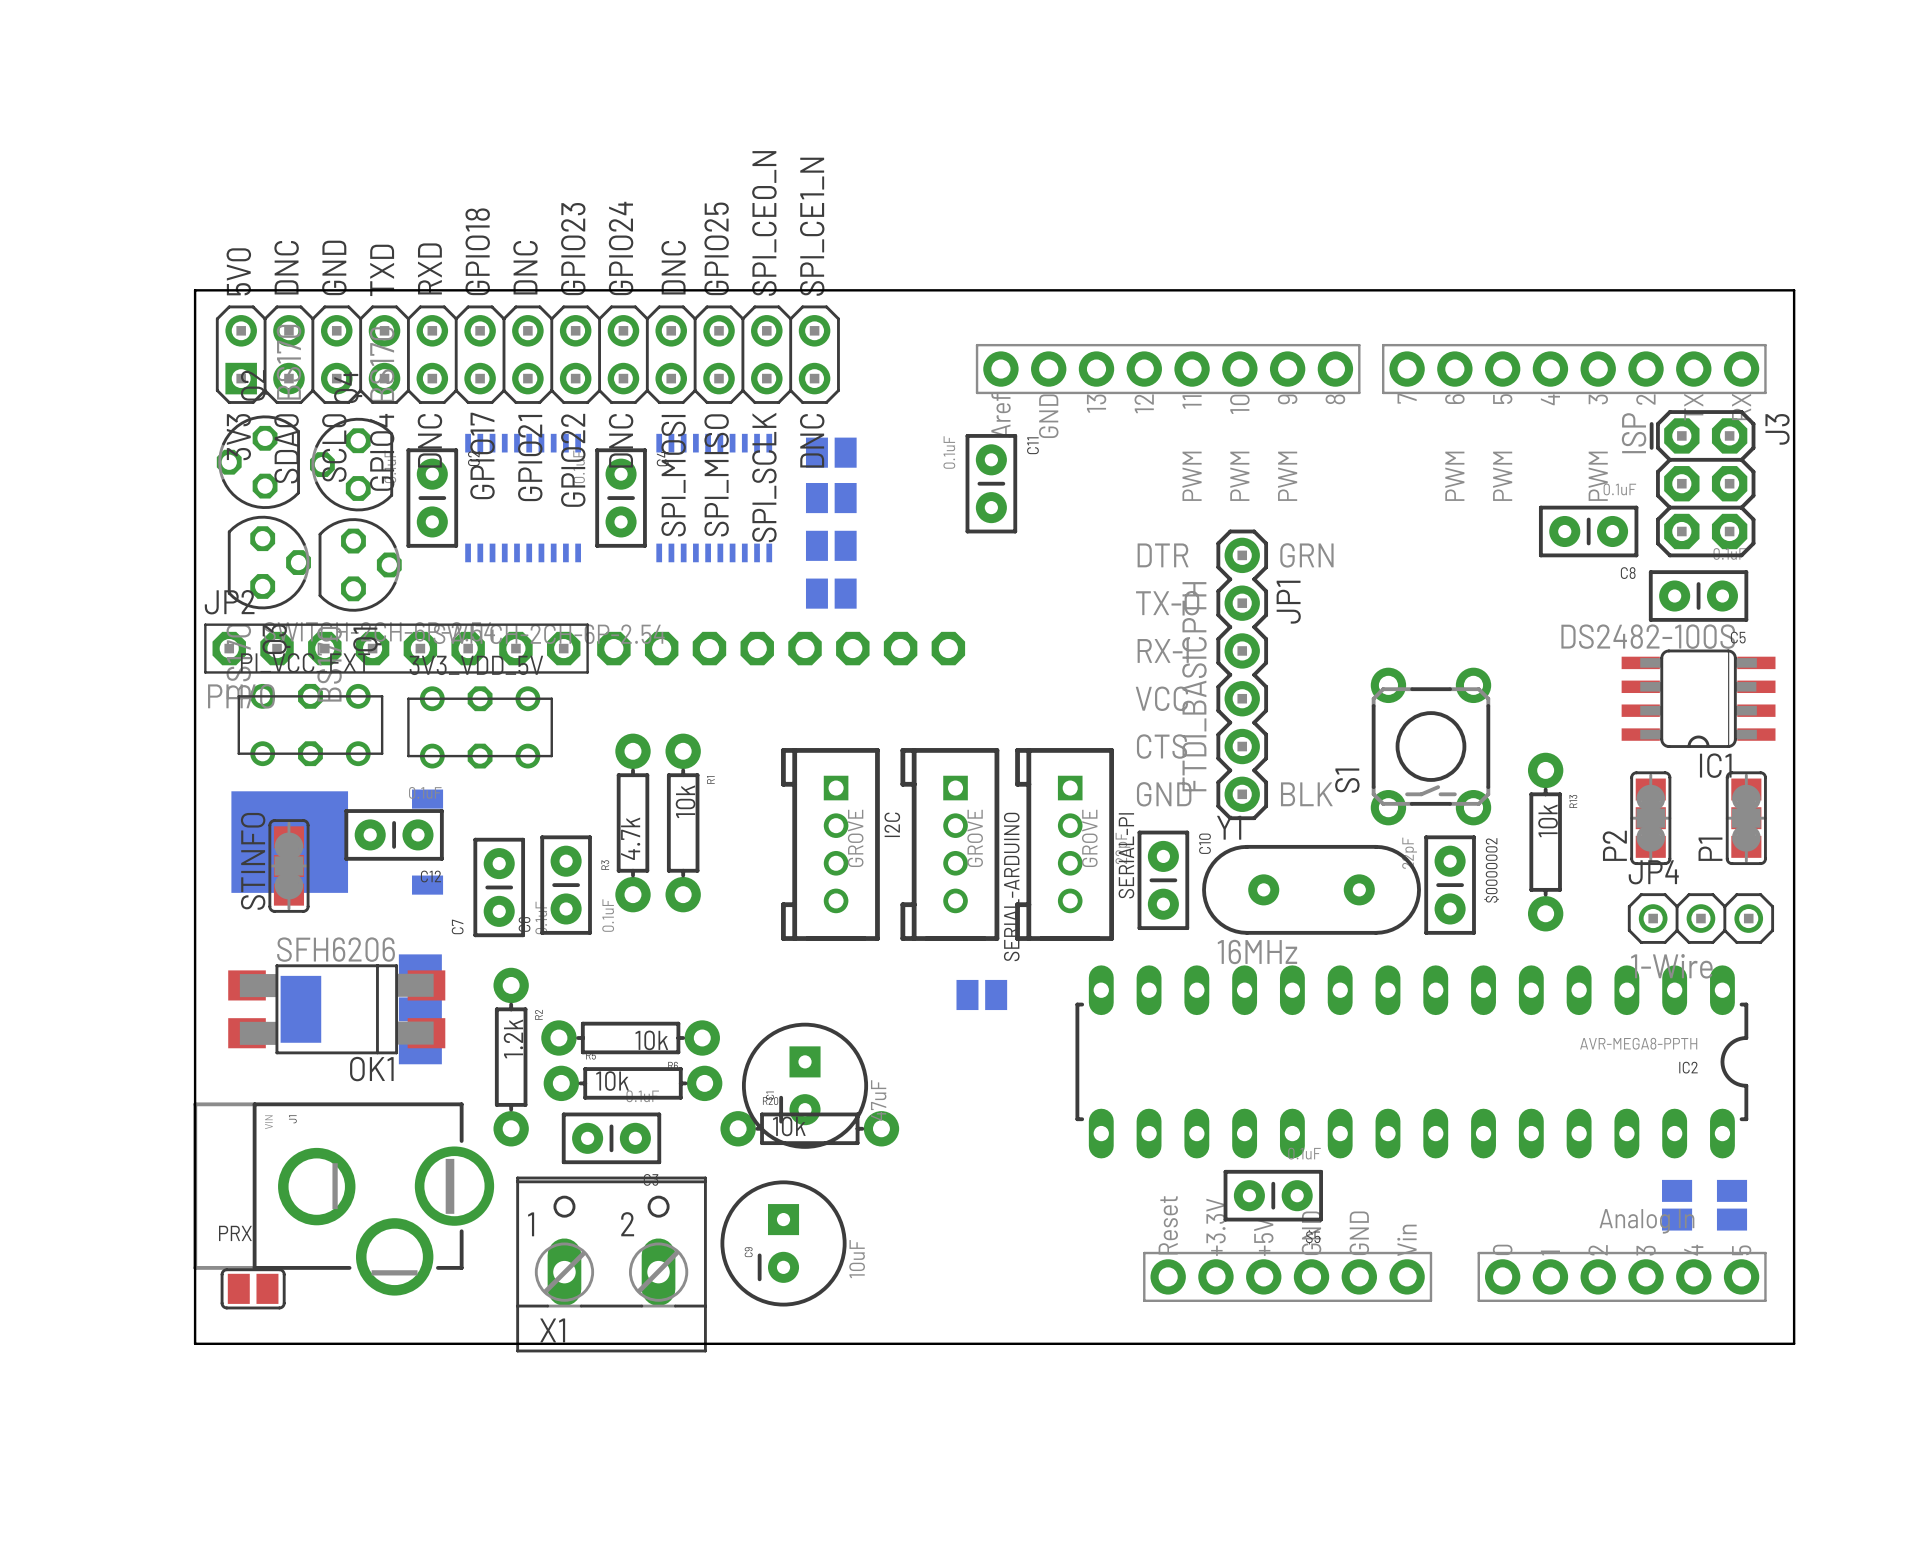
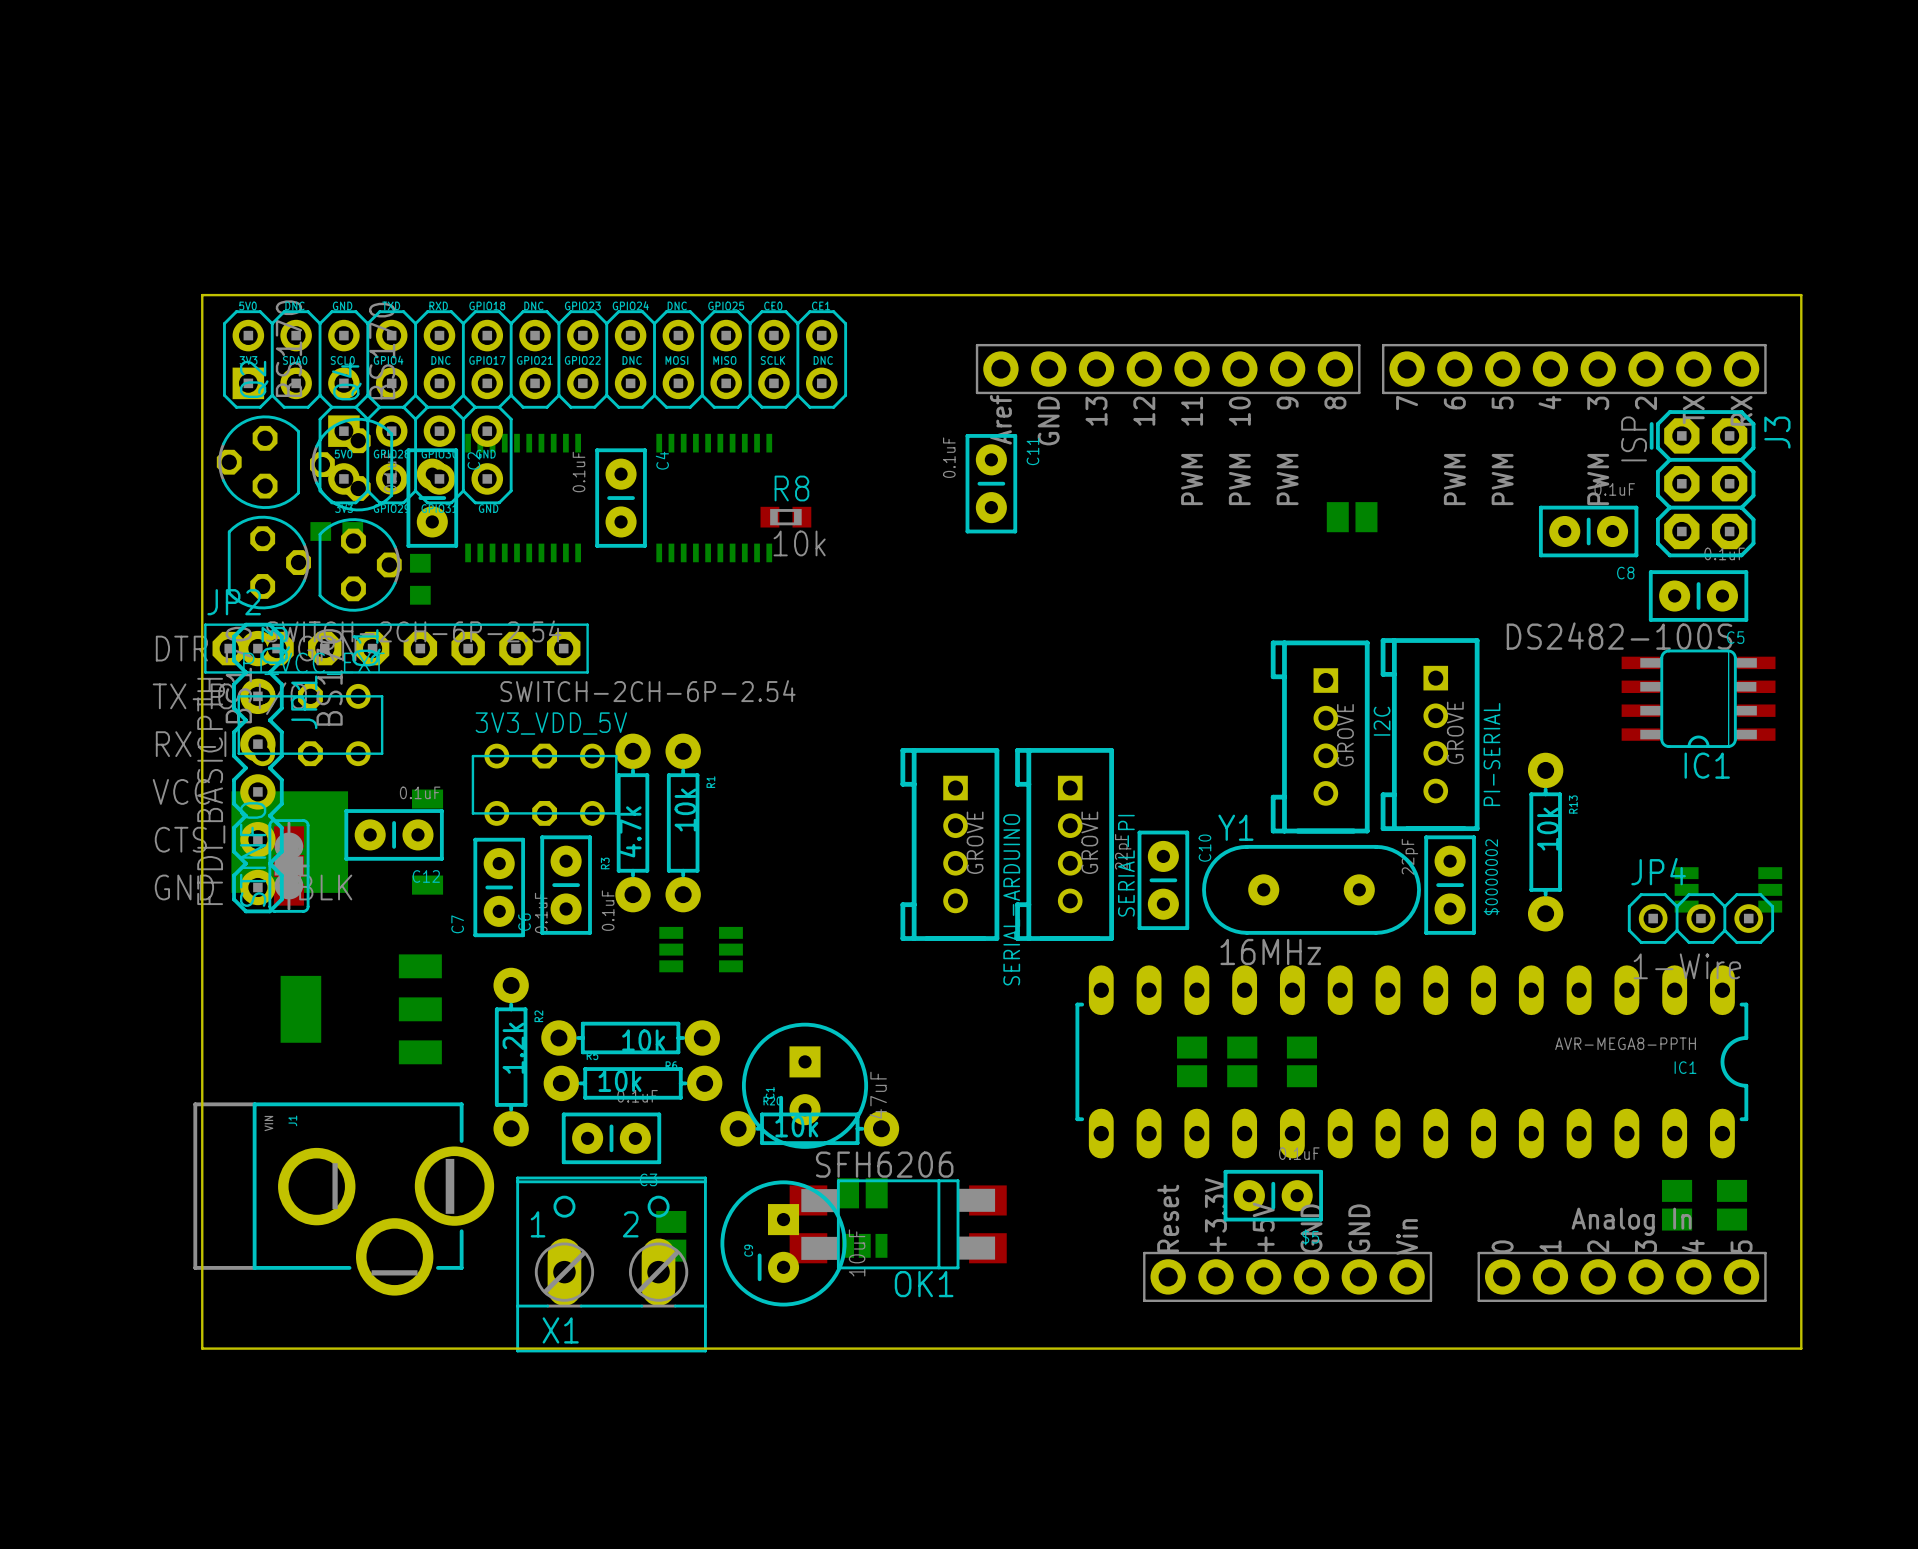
part footprint: [193, 289, 1796, 1346] -> [201, 293, 1803, 1350]
part: (831, 452) -> none
part: (831, 498) -> none
R8: none -> 10k (785, 517)
part: none -> (1352, 517)
part: none -> (336, 531)
part: (831, 545) -> none
part: none -> (420, 579)
part: (831, 593) -> none
part: (781, 648) -> none
JP1 position: (1242, 674) -> (257, 768)
3V3_VDD_5V position: (480, 727) -> (544, 784)
PI-SERIAL: none -> GROVE (1430, 734)
S1: (1430, 746) -> none
P2: (1650, 818) -> none
P1: (1746, 818) -> none
I2C position: (830, 844) -> (1320, 736)
part: none -> (1686, 889)
part: none -> (1770, 889)
part: none -> (671, 949)
part: none -> (730, 949)
part: (981, 994) -> none
OK1 position: (336, 1009) -> (898, 1224)
part: none -> (1192, 1061)
part: none -> (1242, 1061)
part: none -> (1301, 1061)
IC2 name: IC2 (1688, 1067) -> IC1 (1685, 1067)
part: none -> (862, 1193)
part: none -> (671, 1236)
part: none -> (864, 1245)
PRX: (253, 1288) -> none

